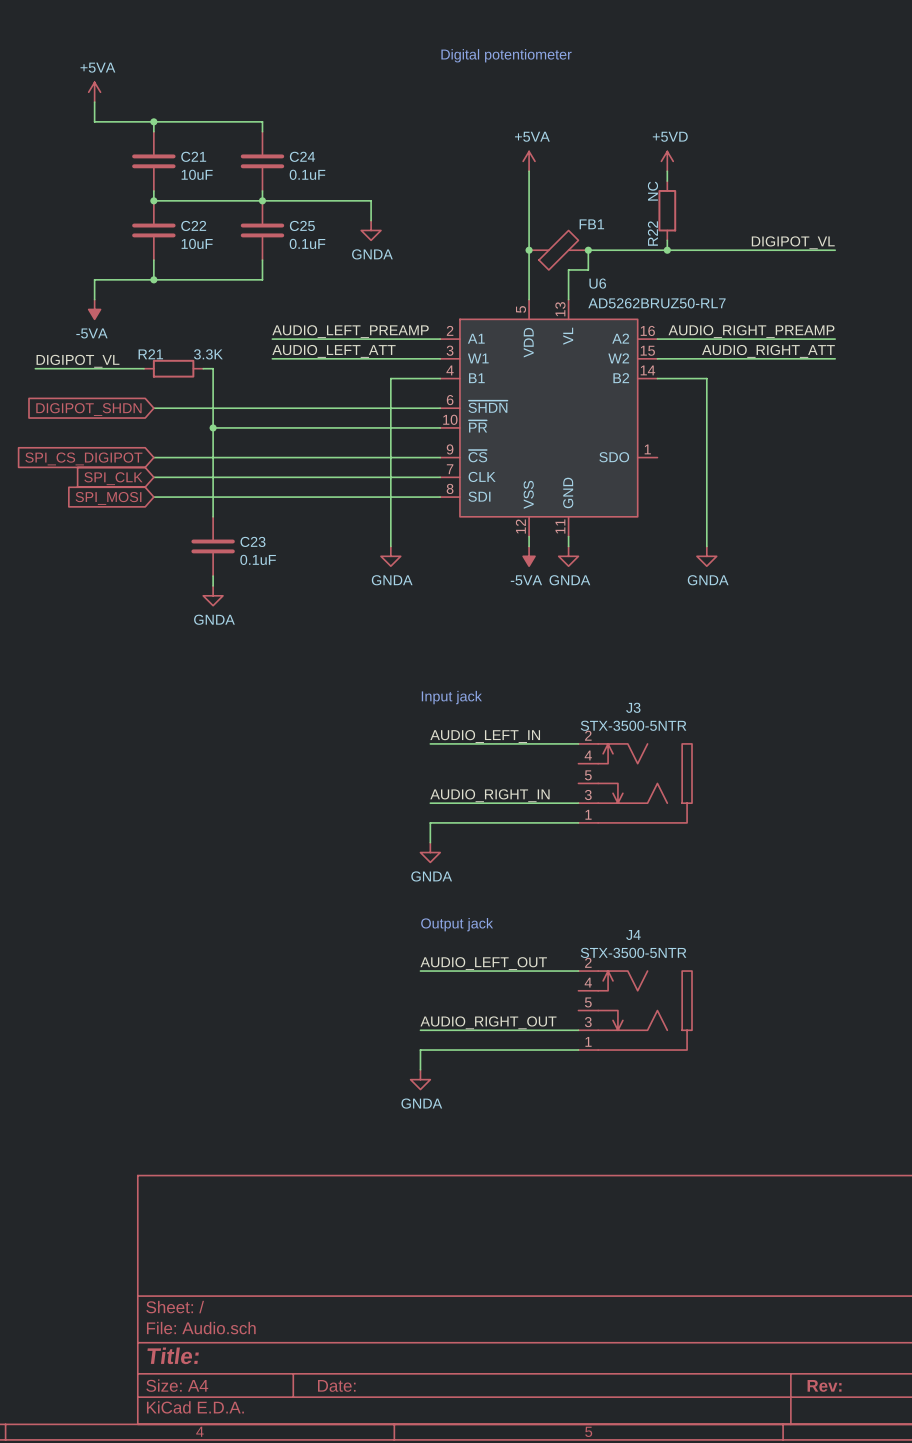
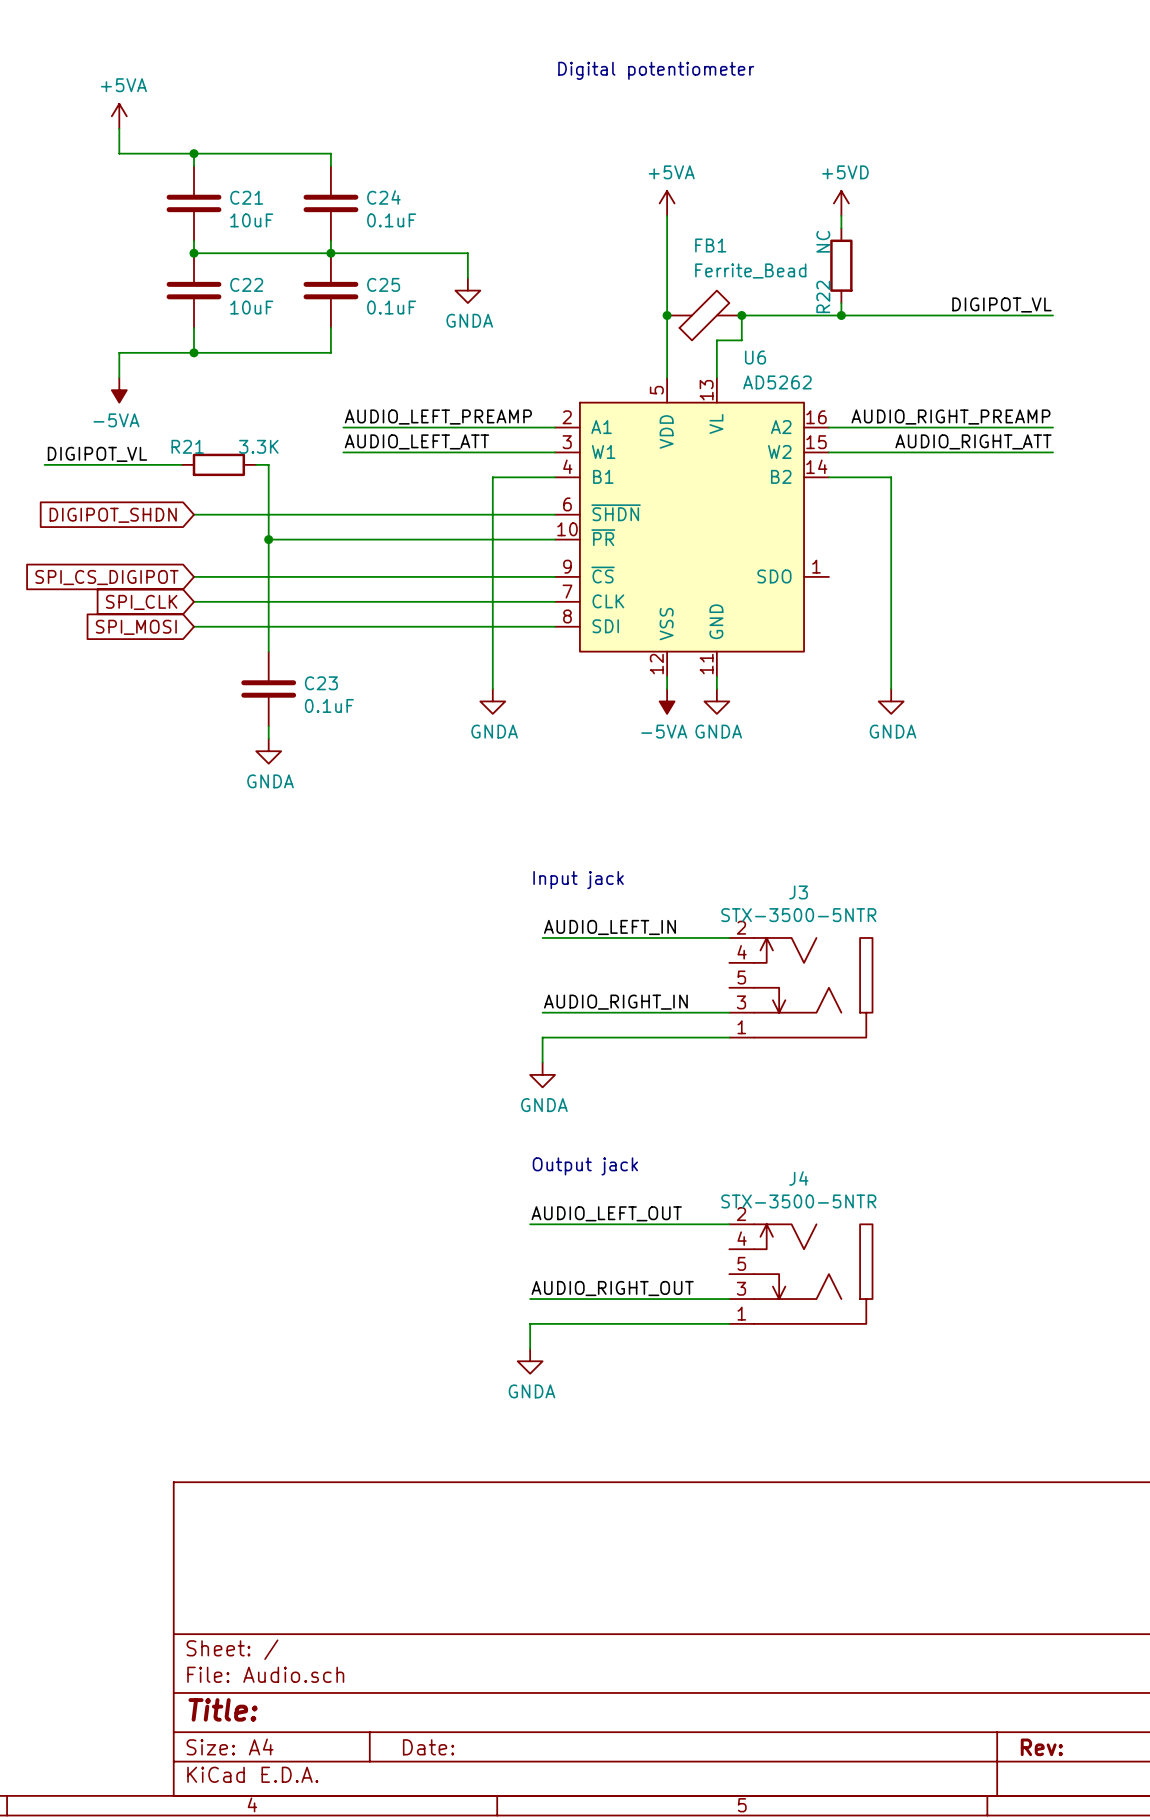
FB1 value: none -> Ferrite_Bead (750, 270)
FB1 name position: FB1 (591, 224) -> FB1 (710, 245)
U6 value: AD5262BRUZ50-RL7 (656, 303) -> AD5262 (777, 382)

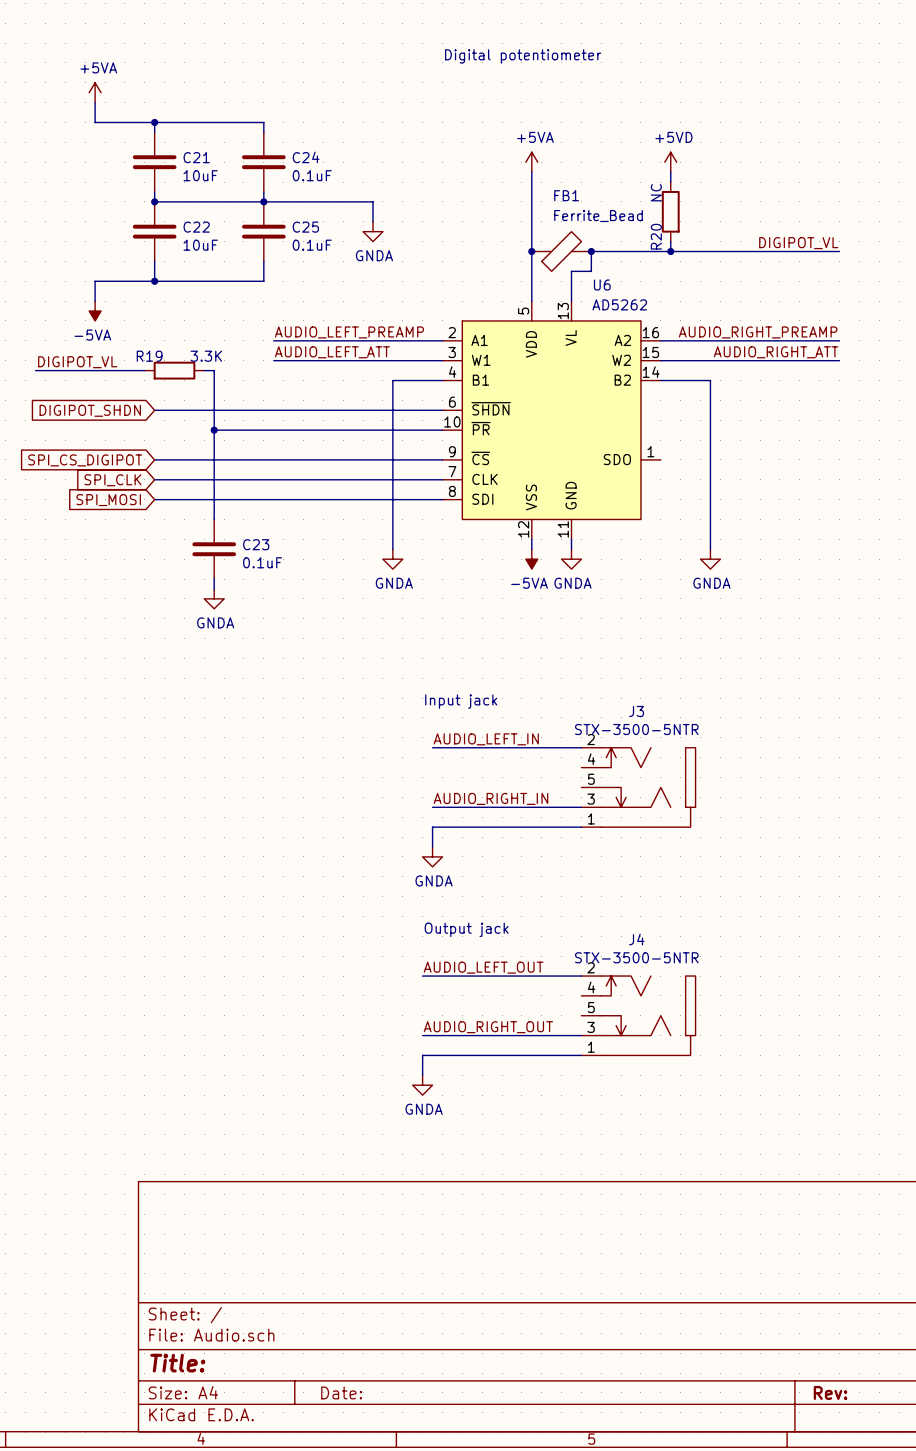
R22 name: R22 (823, 296) -> R20 (656, 236)
R21 name: R21 (187, 446) -> R19 (149, 356)

